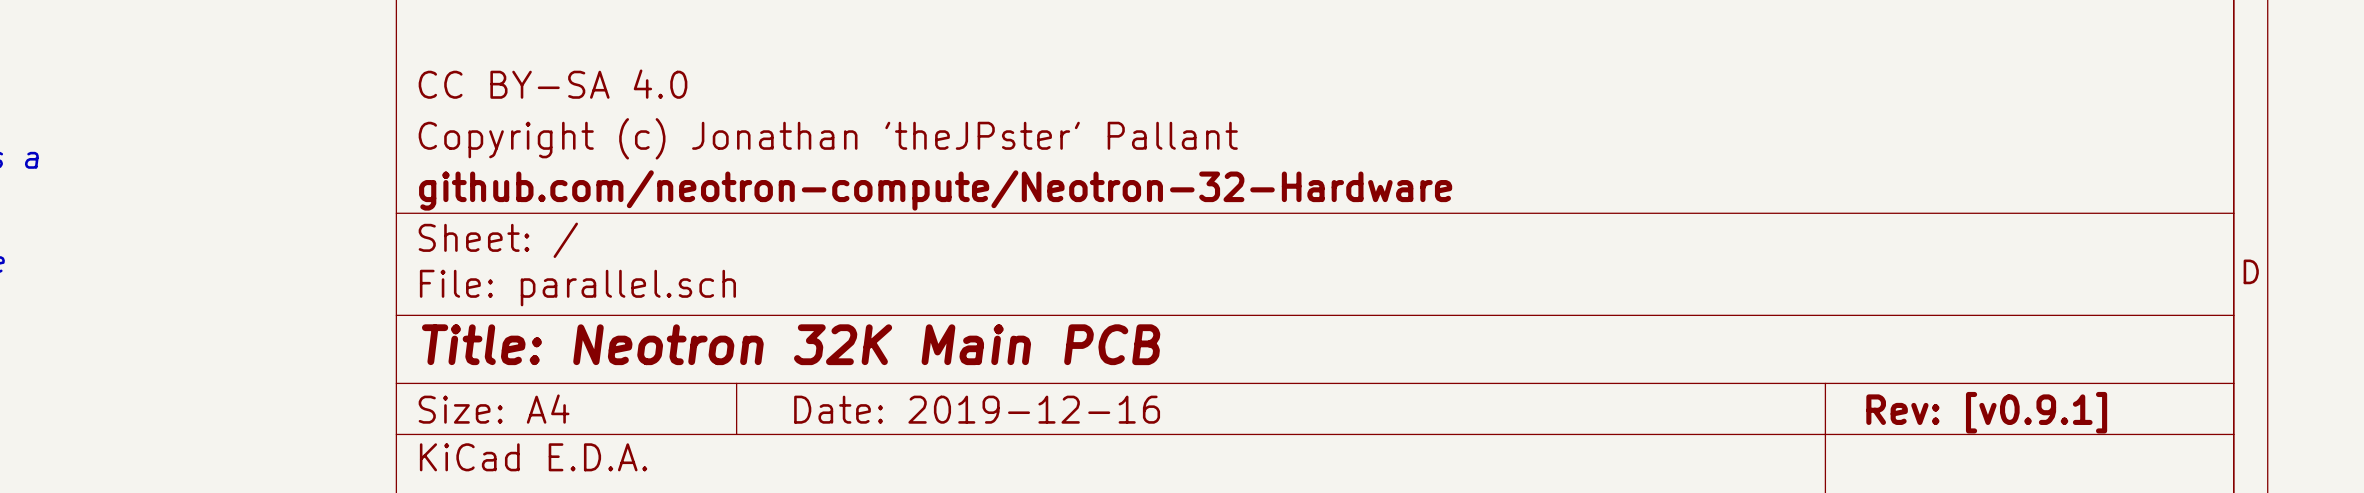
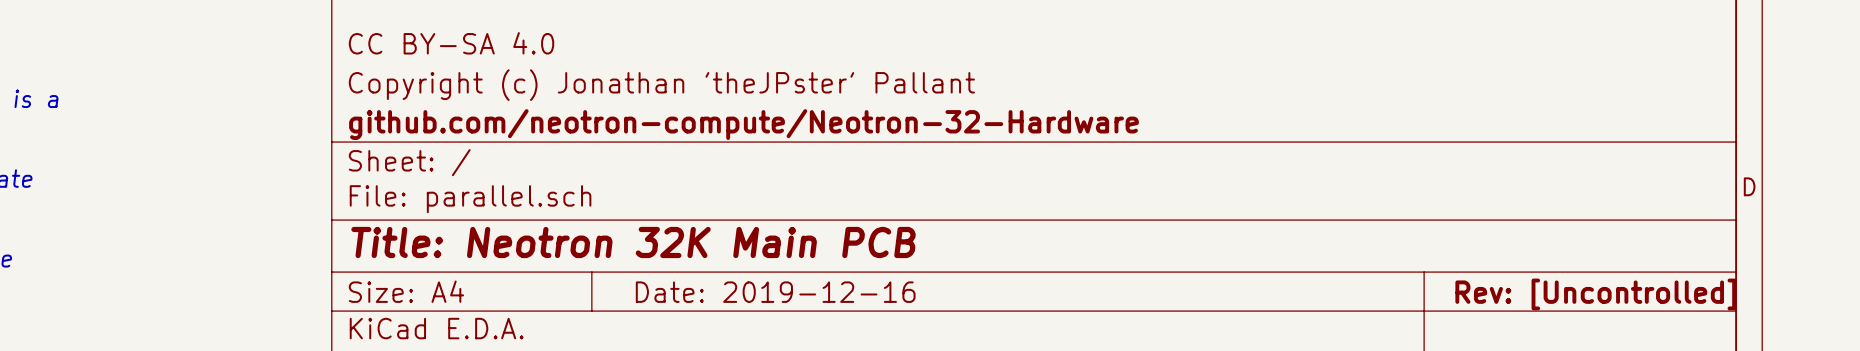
title block: Rev: [v0.9.1] (1986, 412) -> Rev: [Uncontrolled] (1595, 294)

